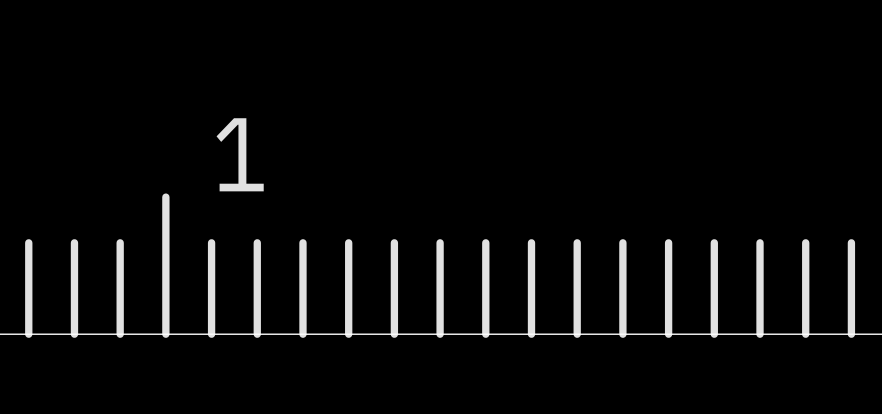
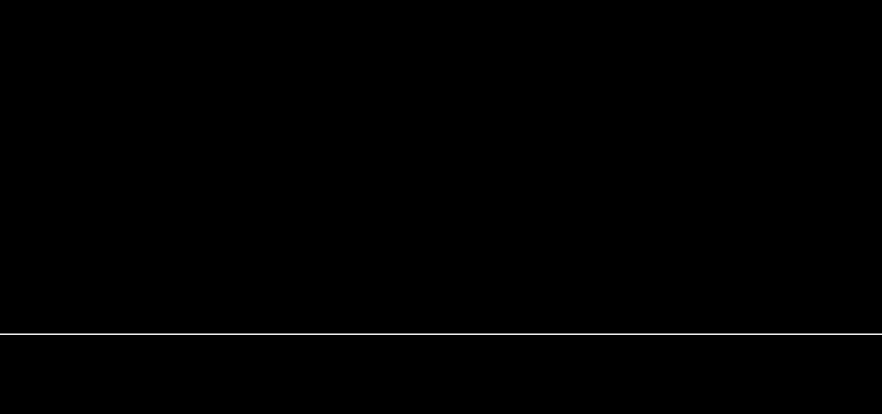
text: 1 (240, 154) -> none
line: (165, 197) (165, 334) -> none
line: (28, 242) (28, 334) -> none
line: (74, 242) (74, 334) -> none
line: (120, 242) (120, 334) -> none
line: (211, 242) (211, 334) -> none
line: (257, 242) (257, 334) -> none
line: (302, 242) (302, 334) -> none
line: (348, 242) (348, 334) -> none
line: (394, 242) (394, 334) -> none
line: (440, 242) (440, 334) -> none
line: (485, 242) (485, 334) -> none
line: (531, 242) (531, 334) -> none
line: (577, 242) (577, 334) -> none
line: (622, 242) (622, 334) -> none
line: (668, 242) (668, 334) -> none
line: (714, 242) (714, 334) -> none
line: (760, 242) (760, 334) -> none
line: (805, 242) (805, 334) -> none
line: (851, 242) (851, 334) -> none

